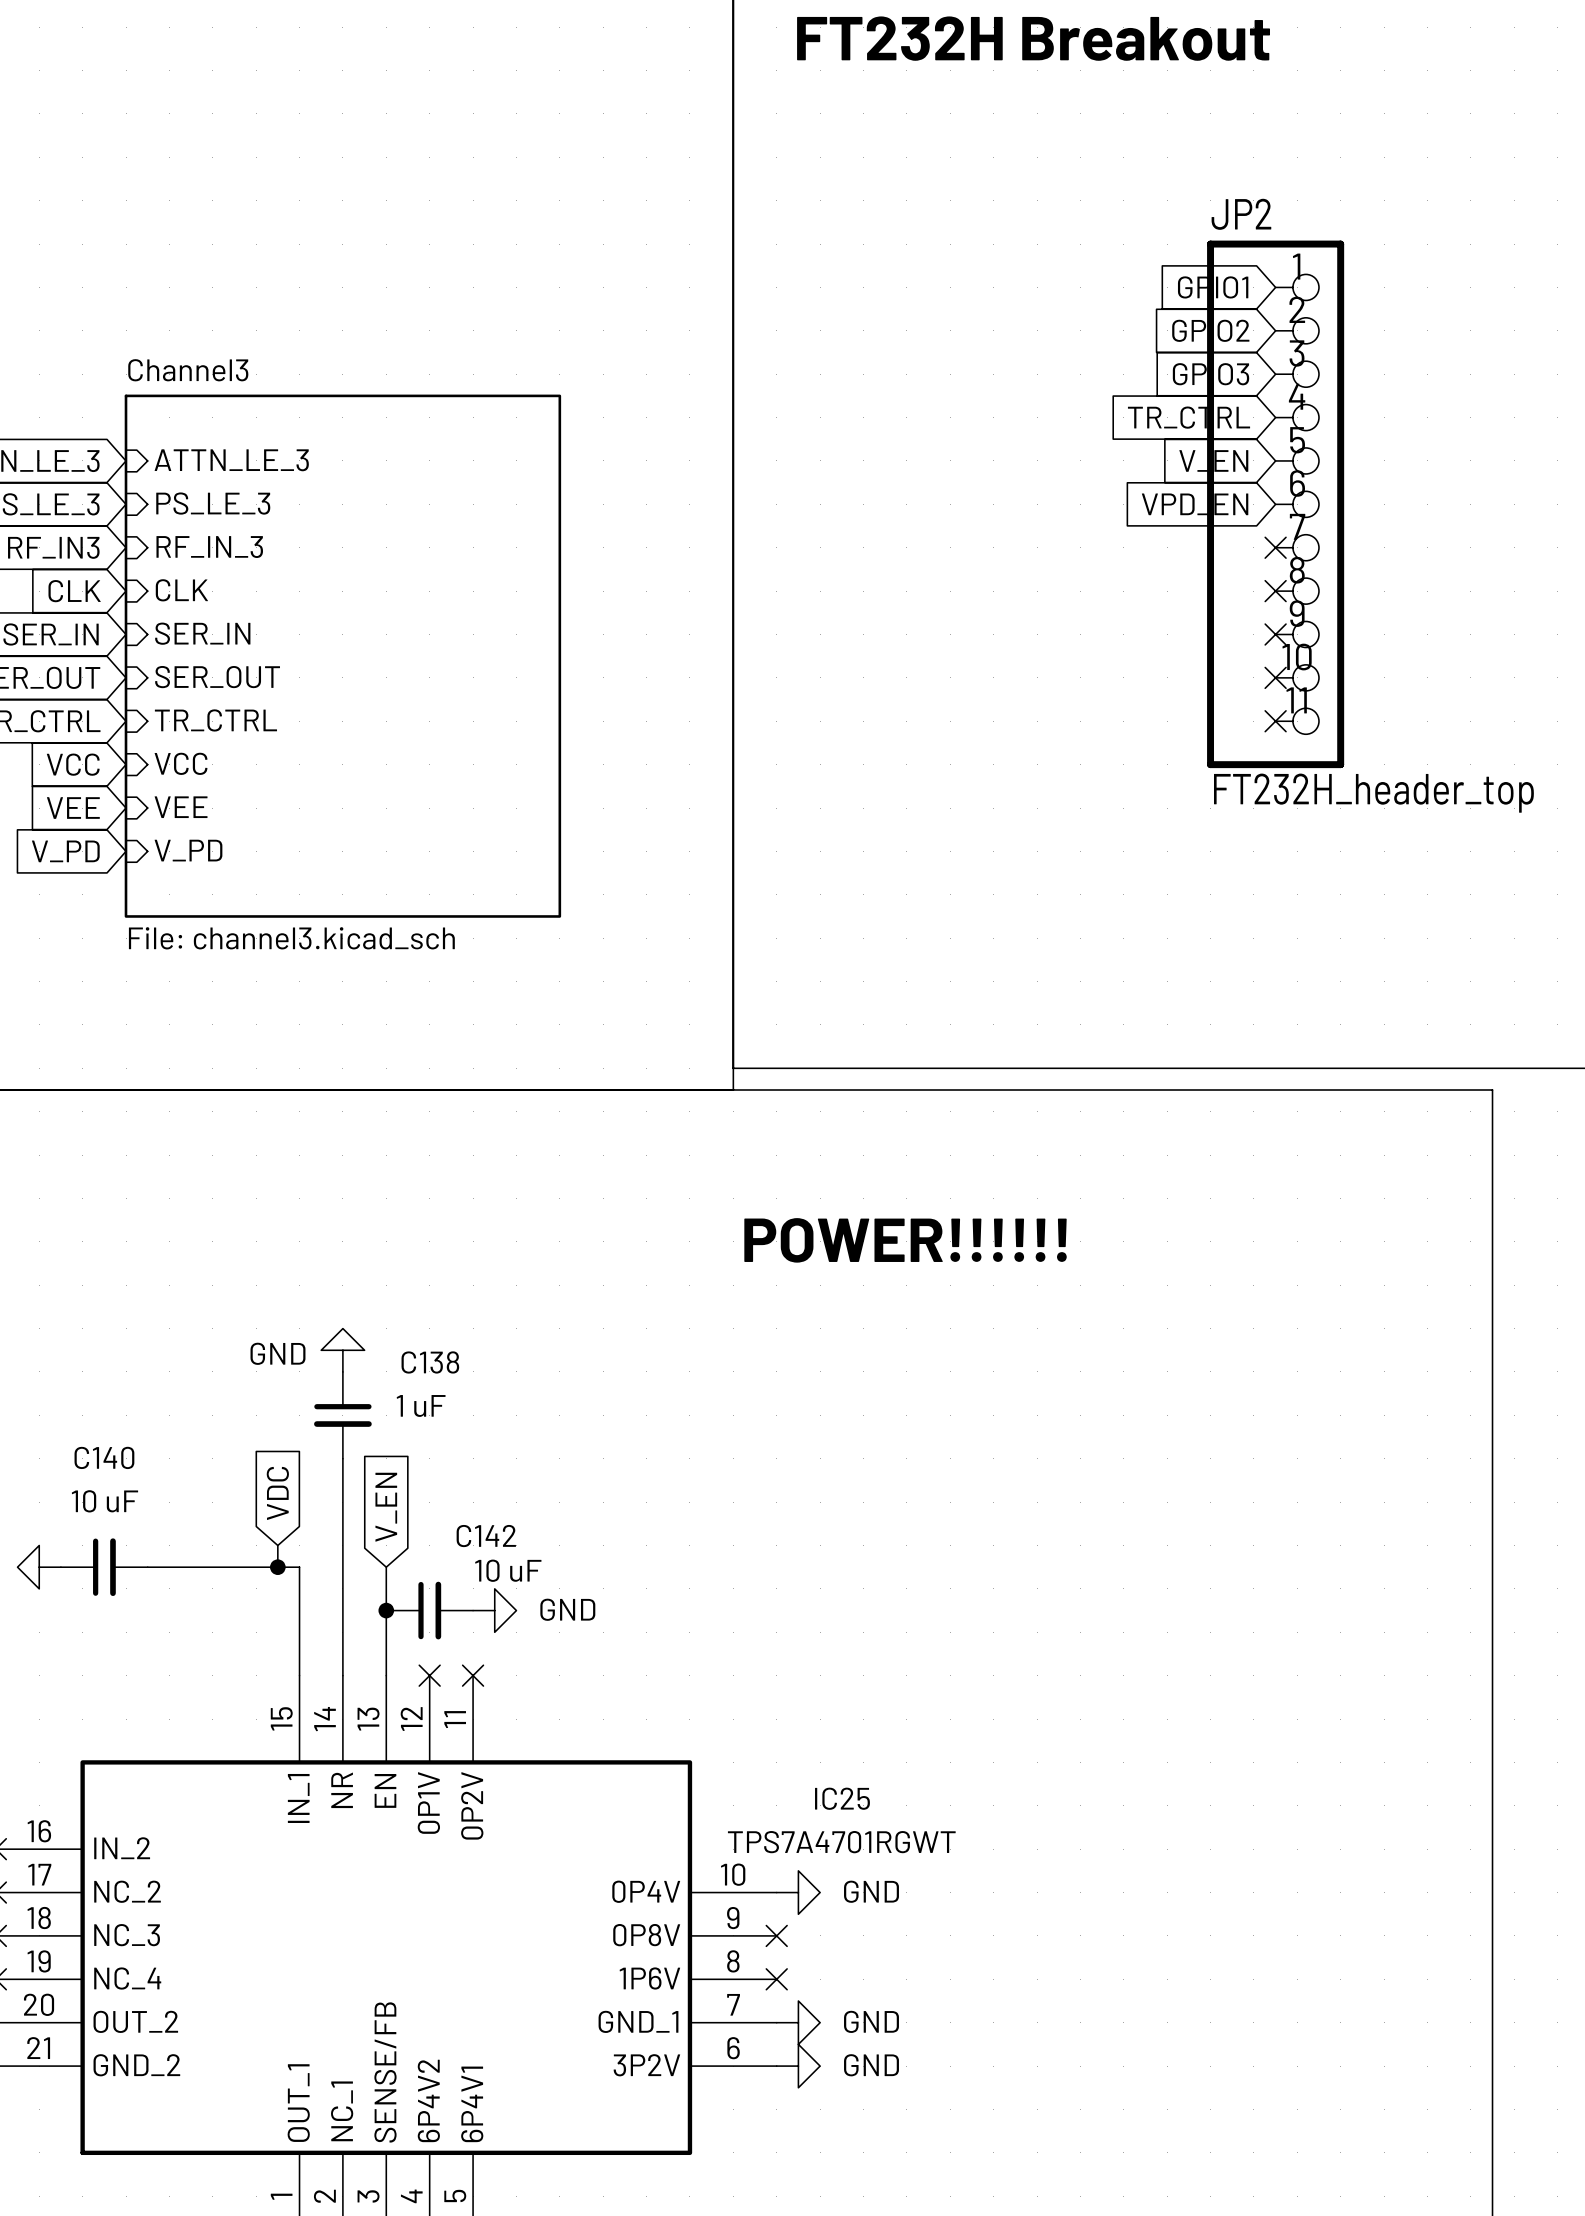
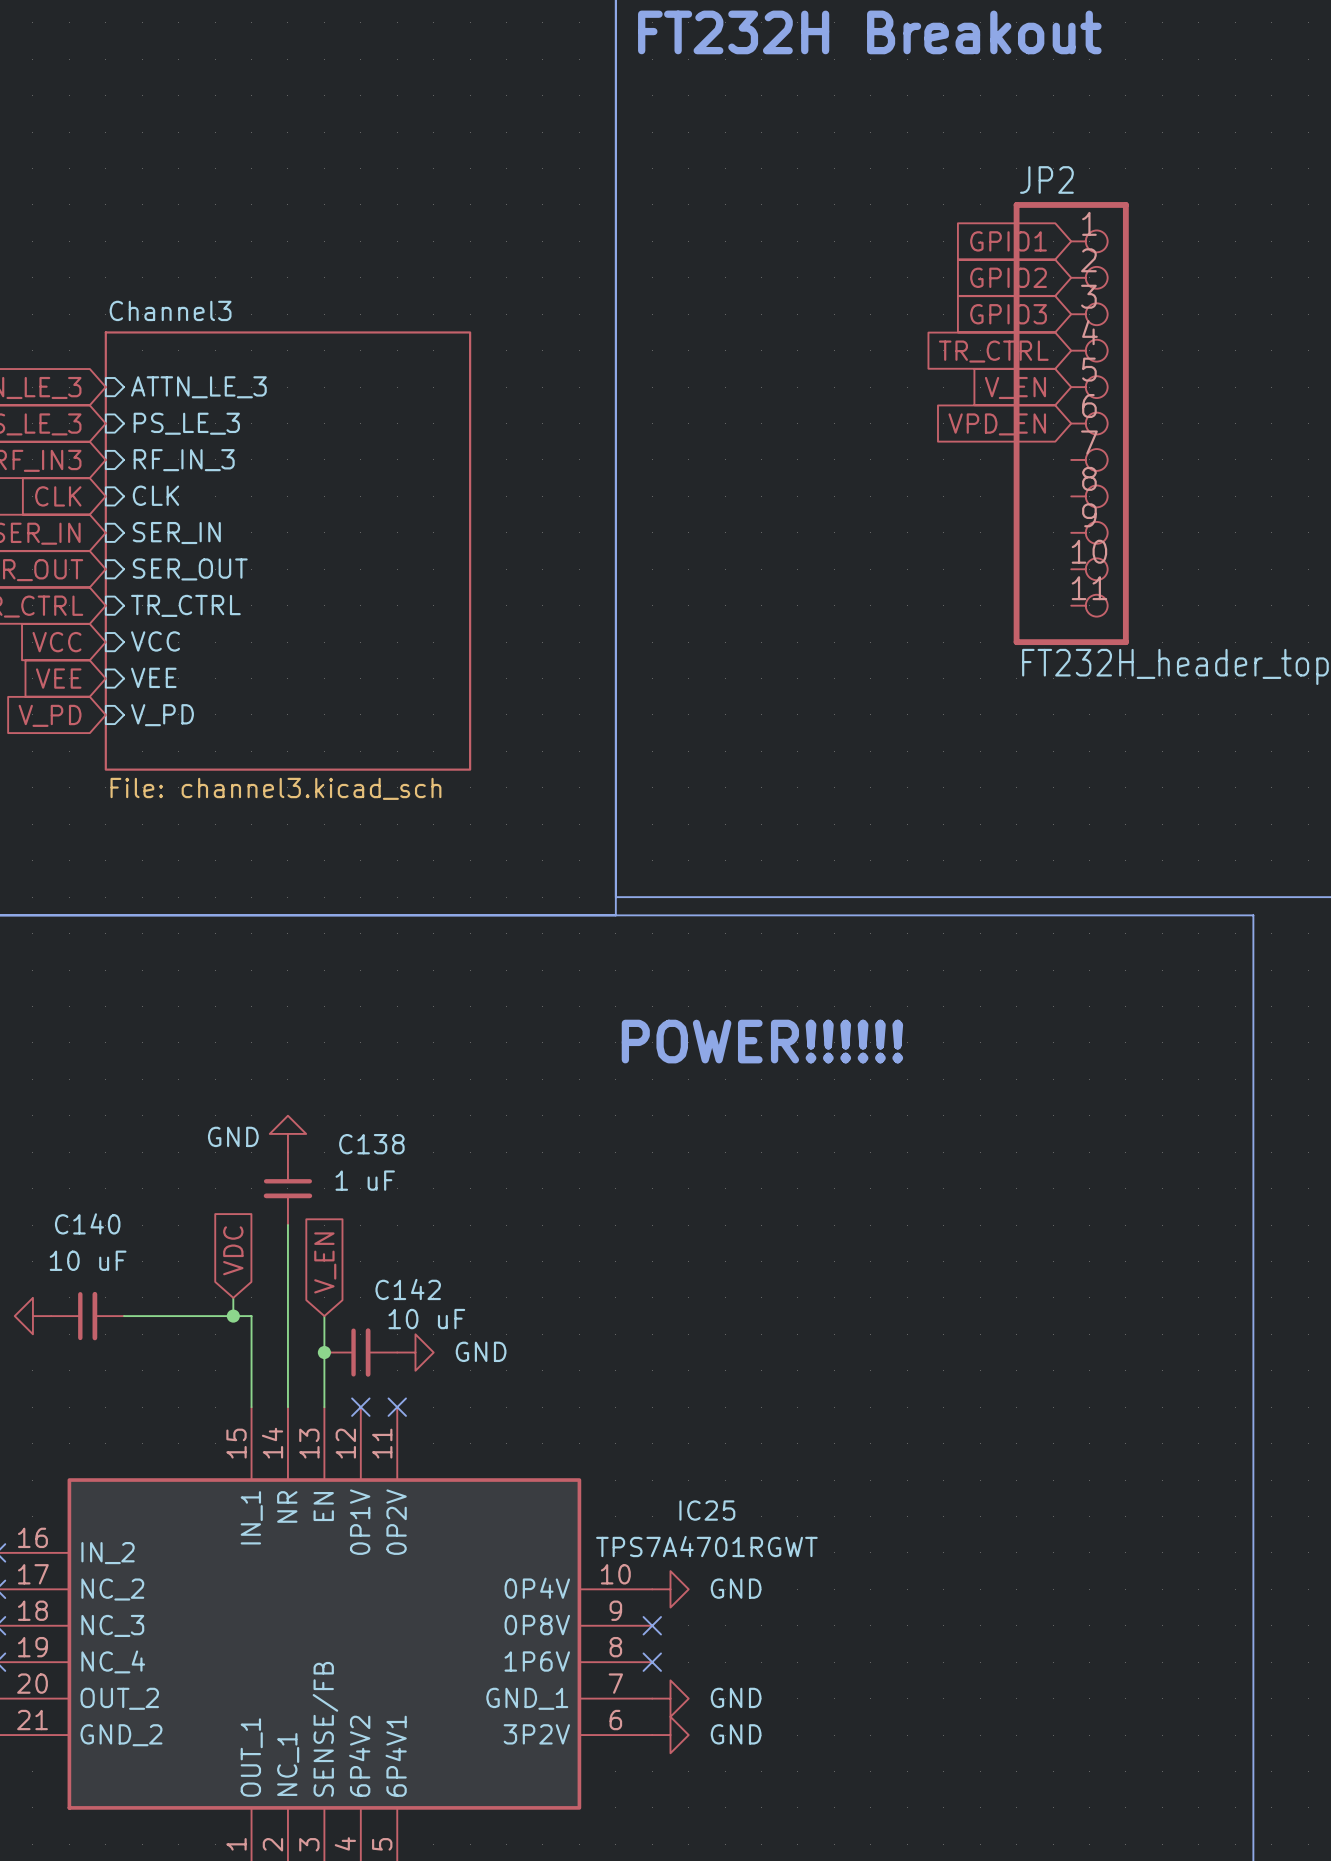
no-connect mark: (1275, 547) -> none
no-connect mark: (1275, 591) -> none
no-connect mark: (1275, 634) -> none
no-connect mark: (1275, 677) -> none
no-connect mark: (1275, 721) -> none

